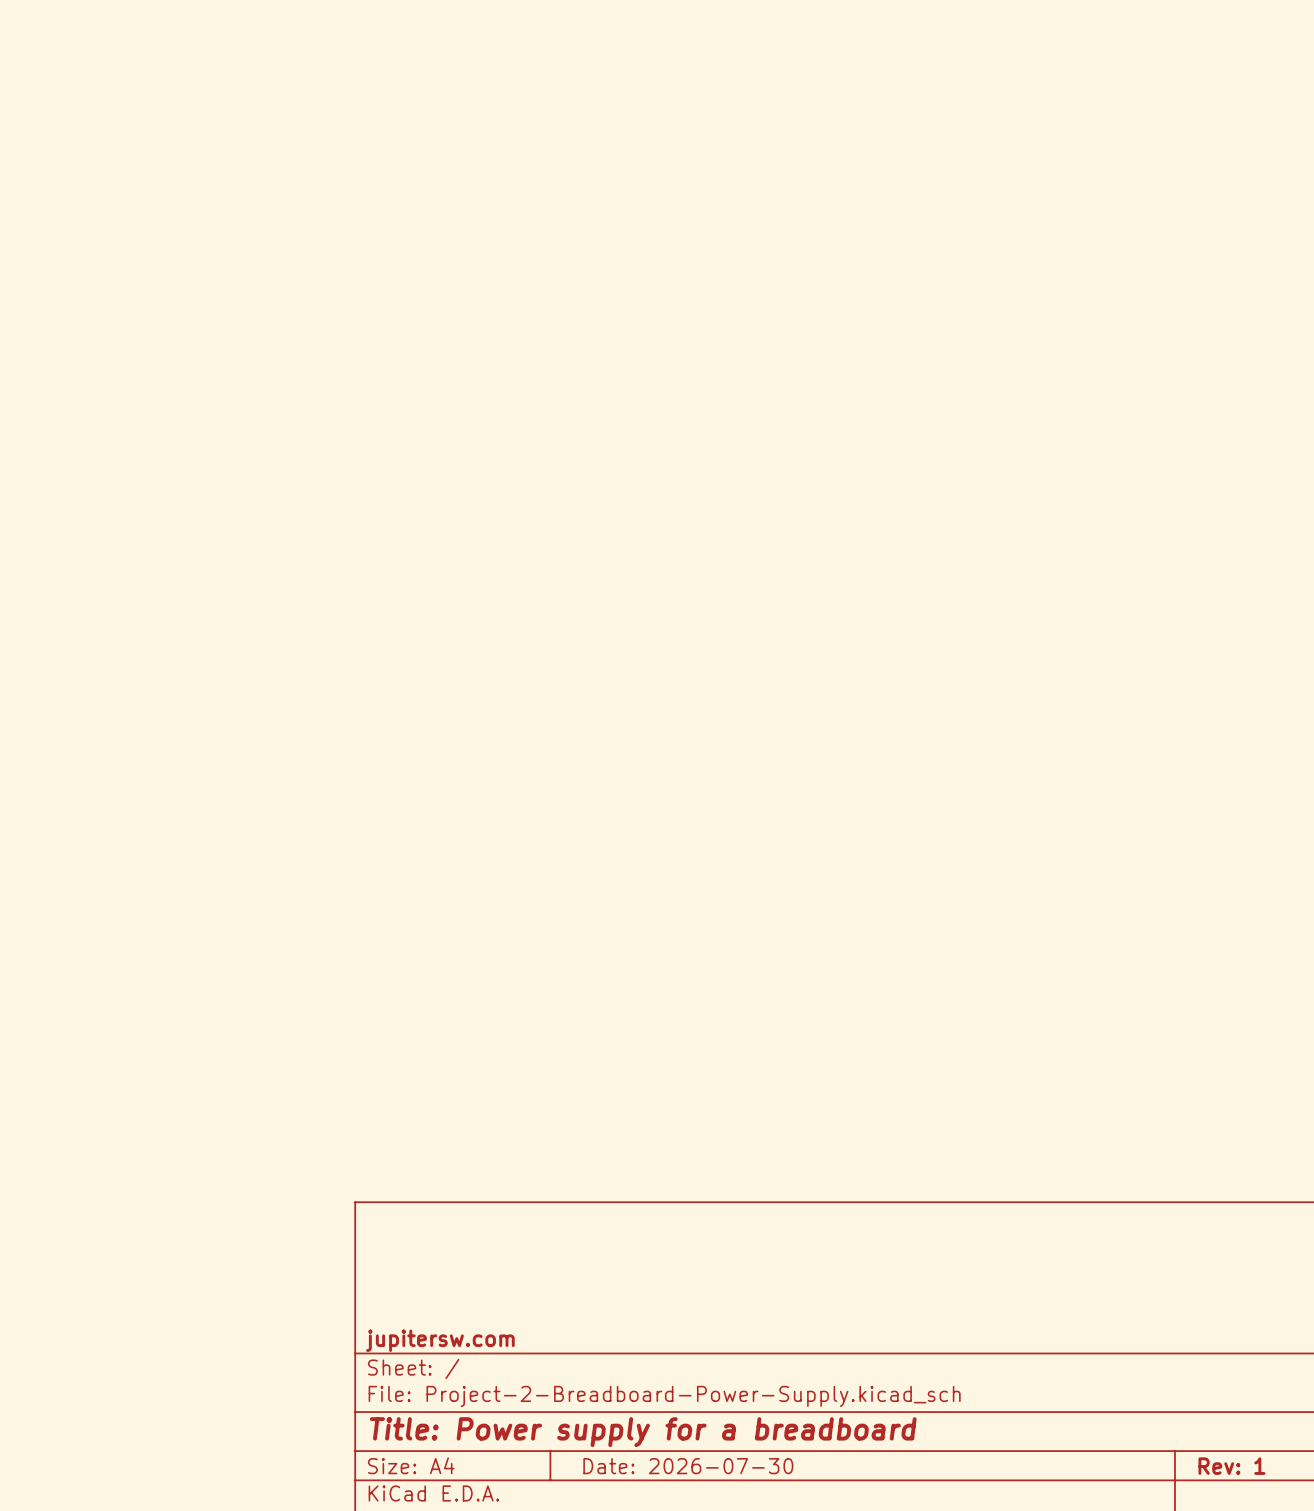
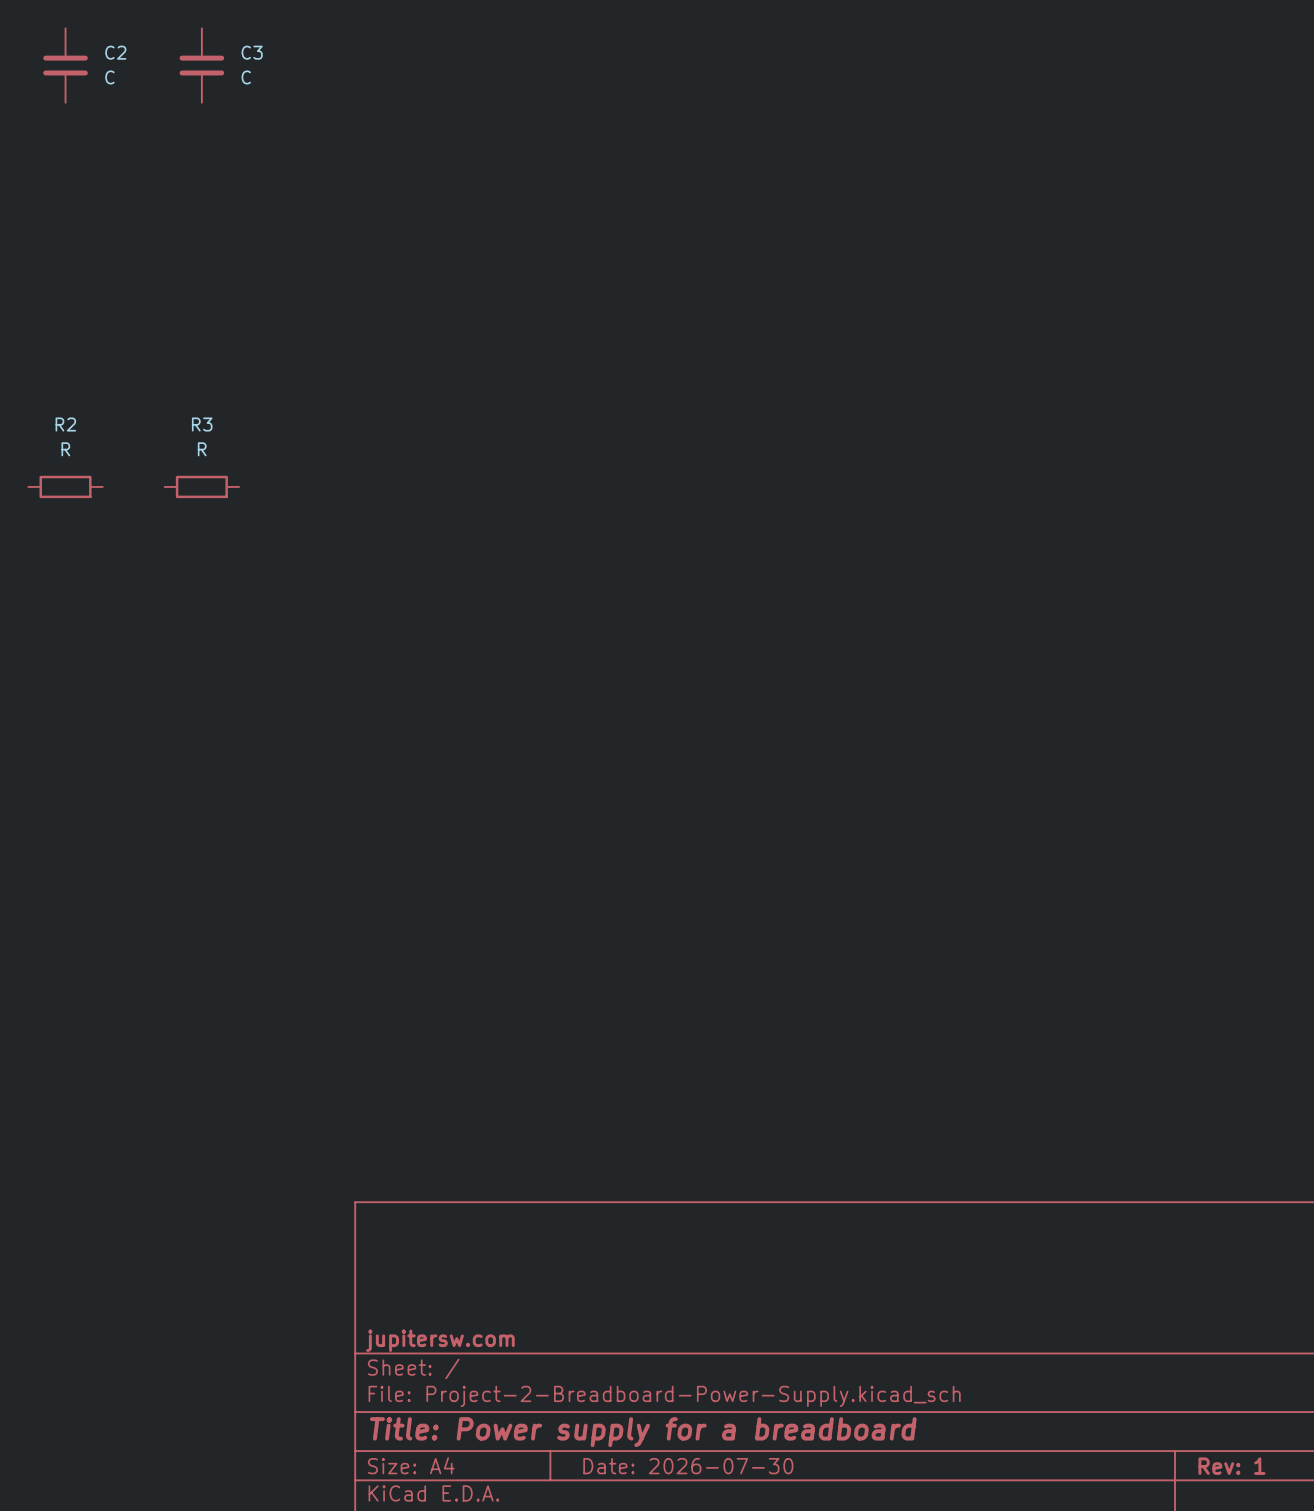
C2: none -> C (65, 65)
C3: none -> C (201, 65)
R2: none -> R (65, 486)
R3: none -> R (201, 486)

